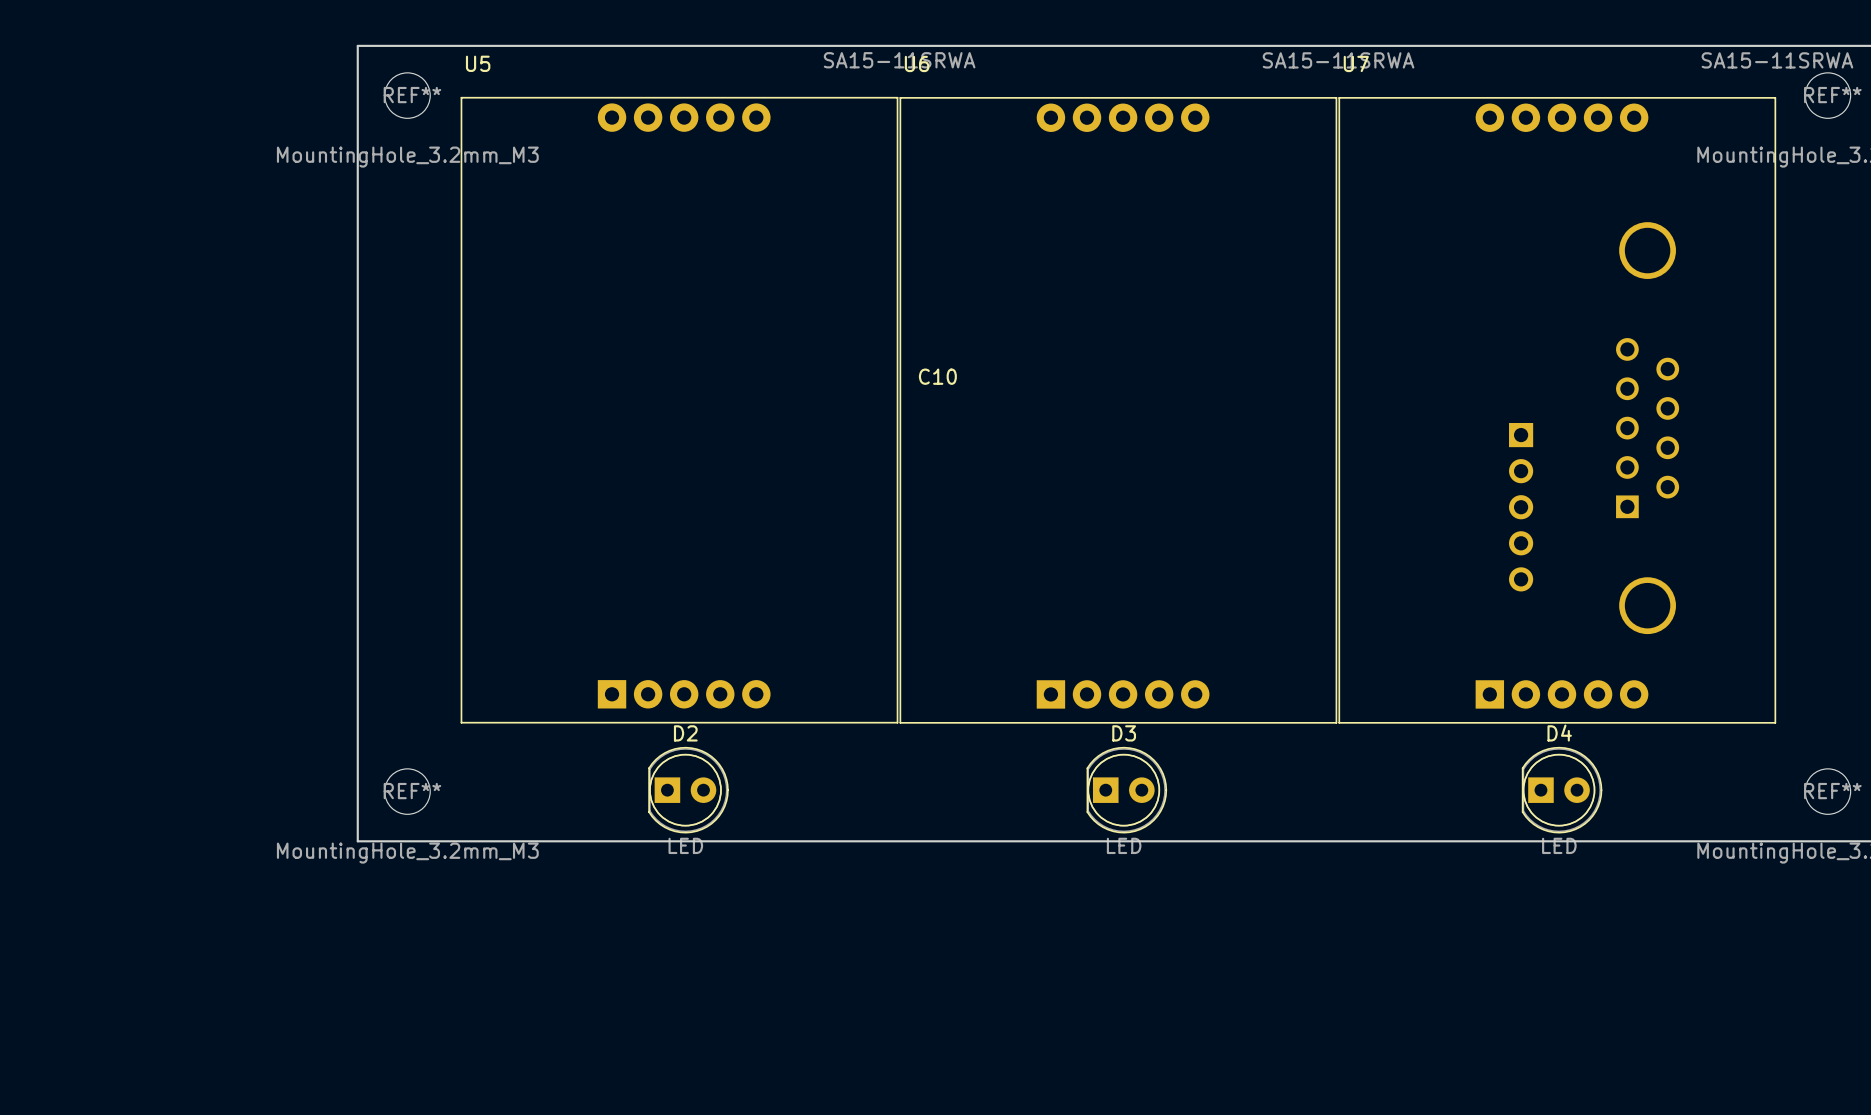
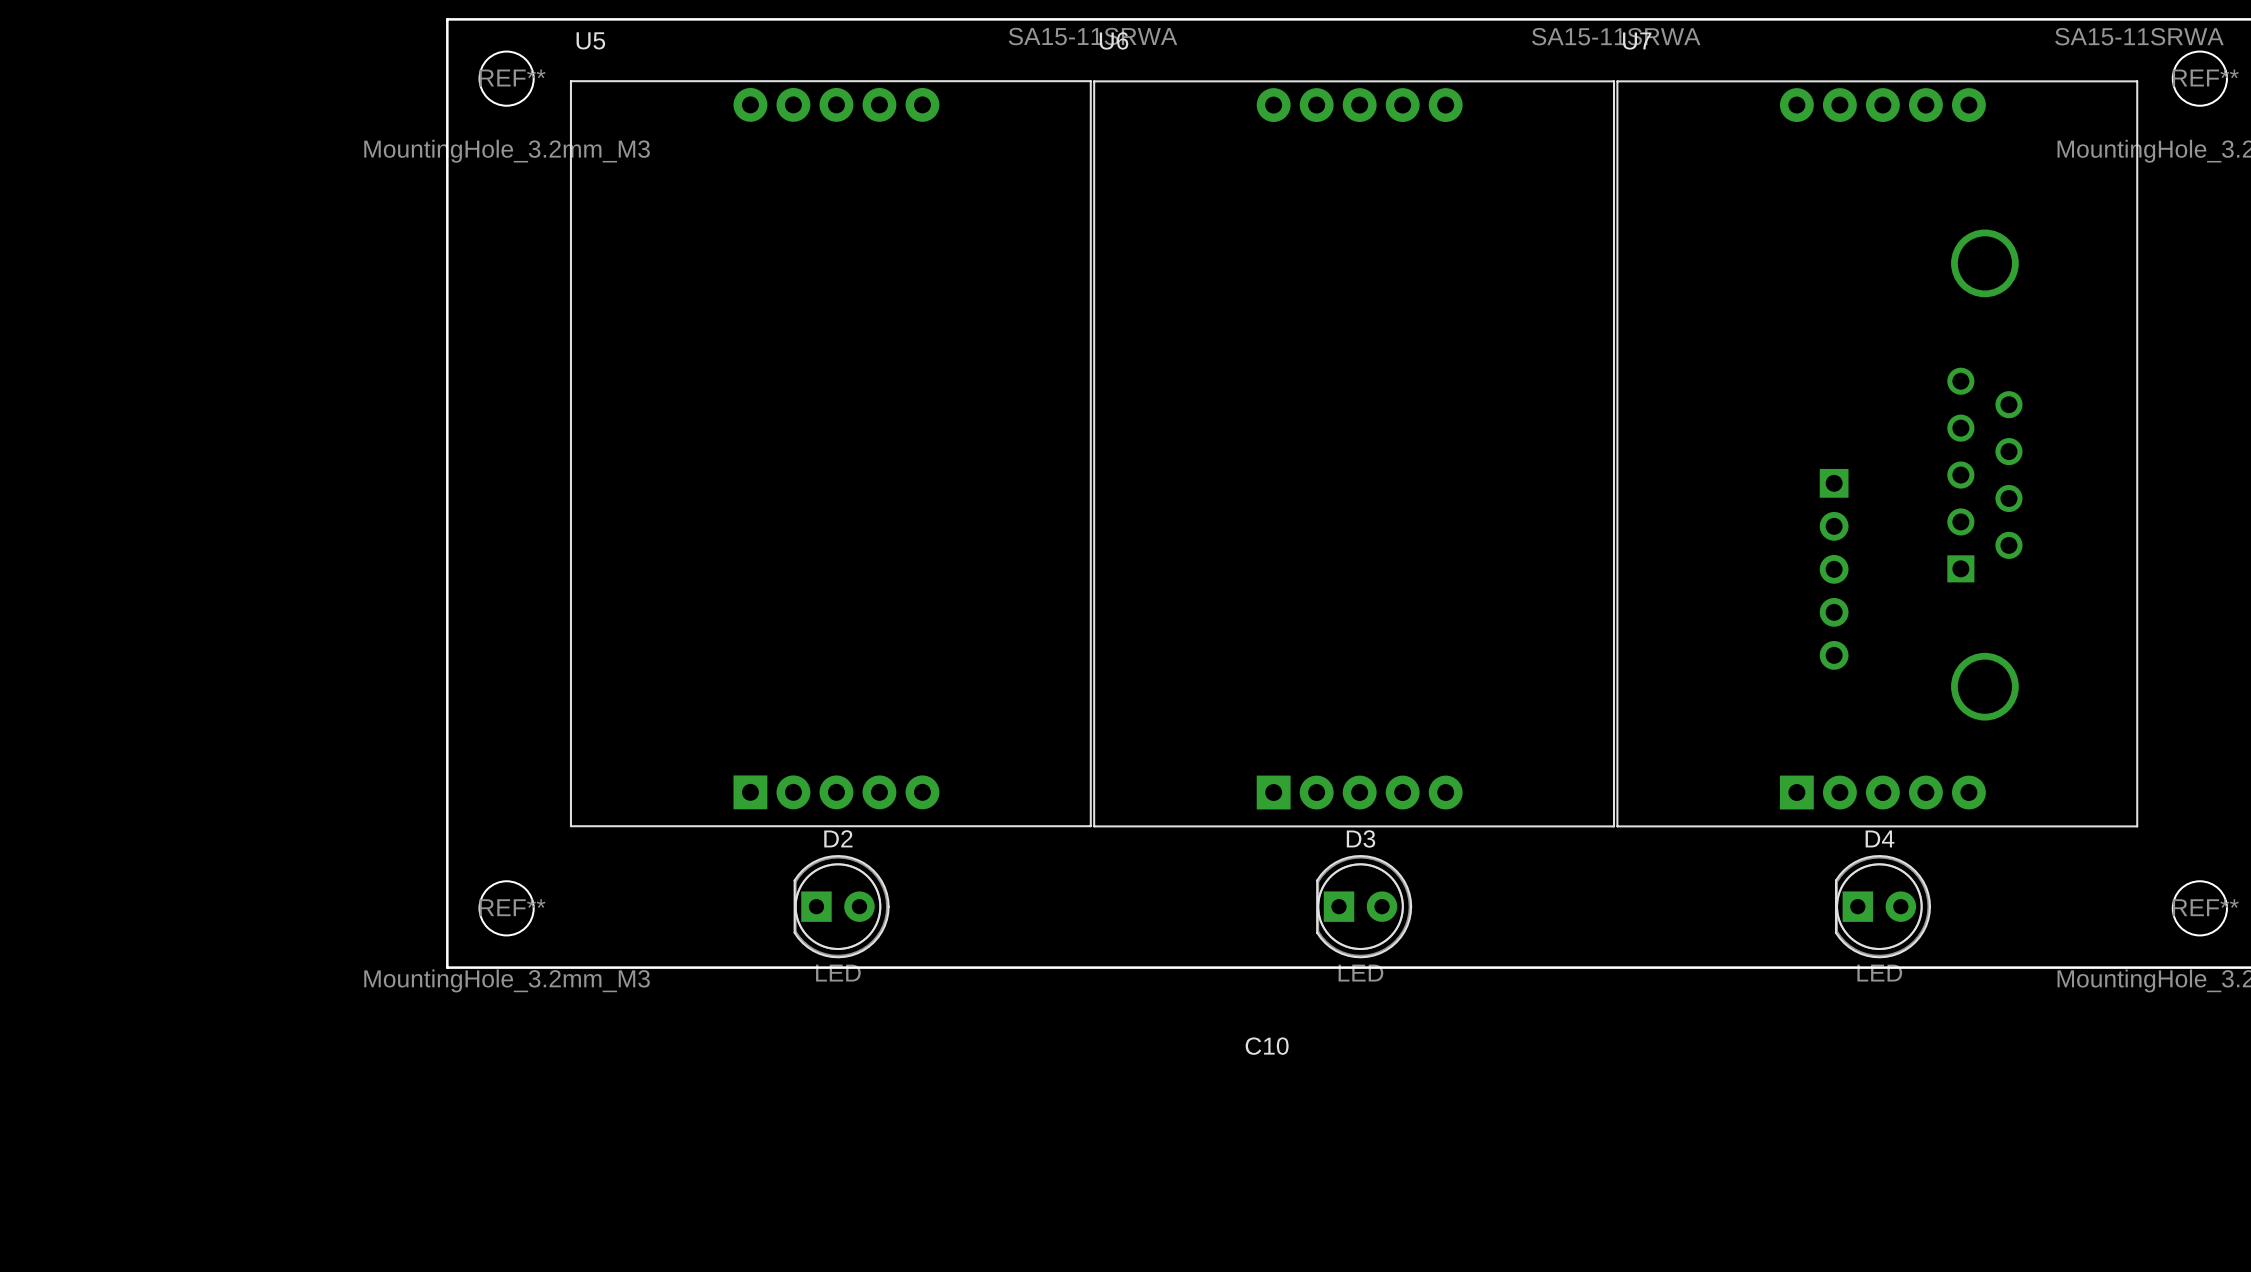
C10 position: (937, 376) -> (1267, 1046)

